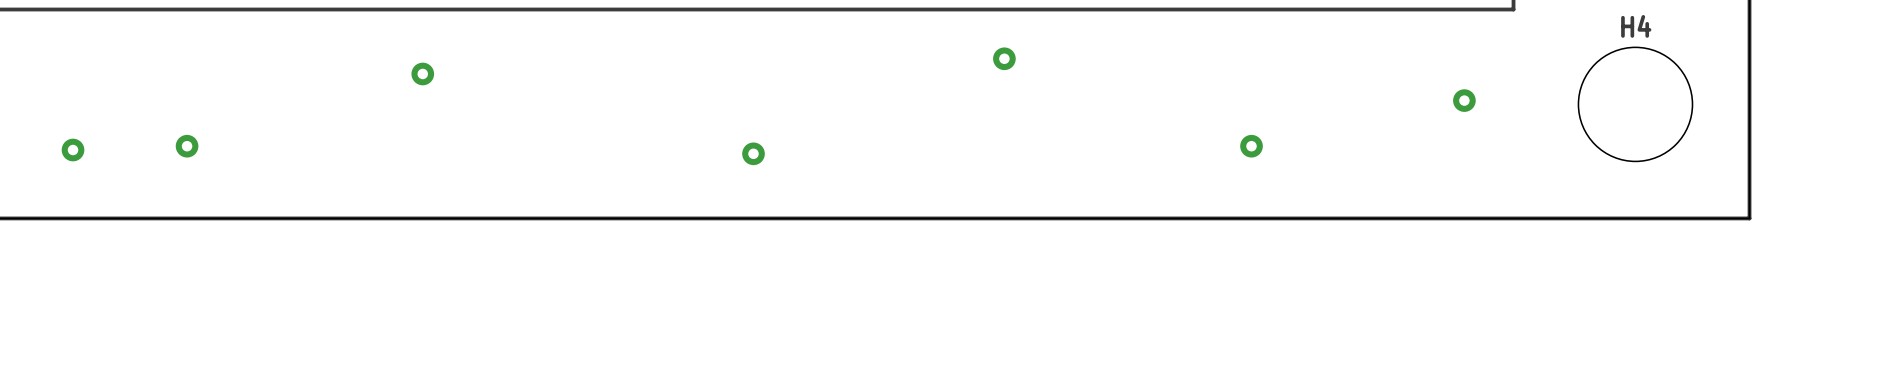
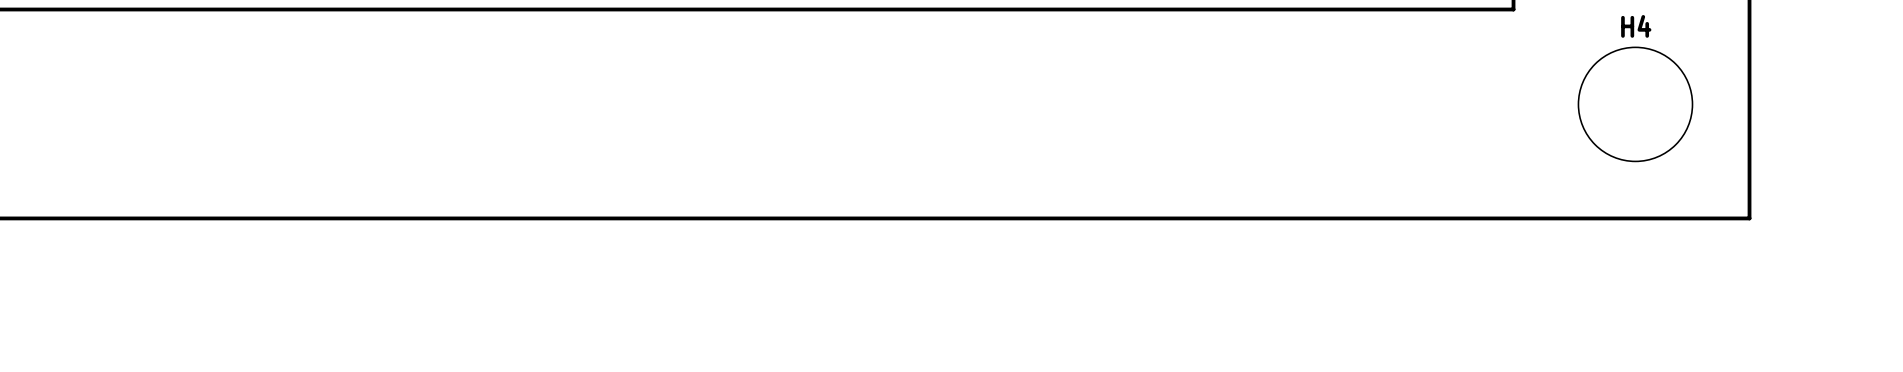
via: (1004, 58) -> none
via: (422, 73) -> none
via: (1464, 100) -> none
via: (187, 146) -> none
via: (1251, 146) -> none
via: (73, 150) -> none
via: (753, 153) -> none

